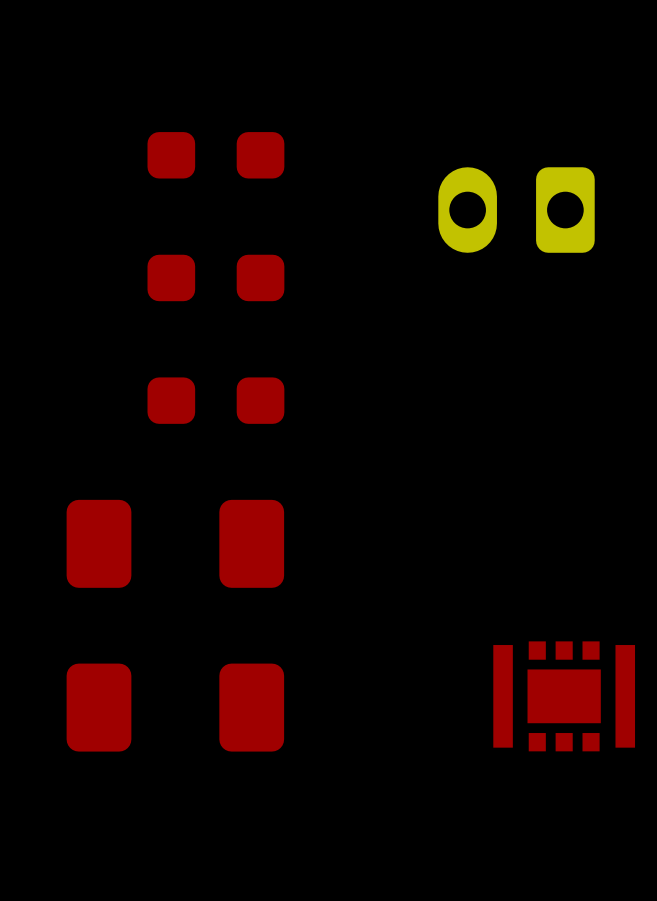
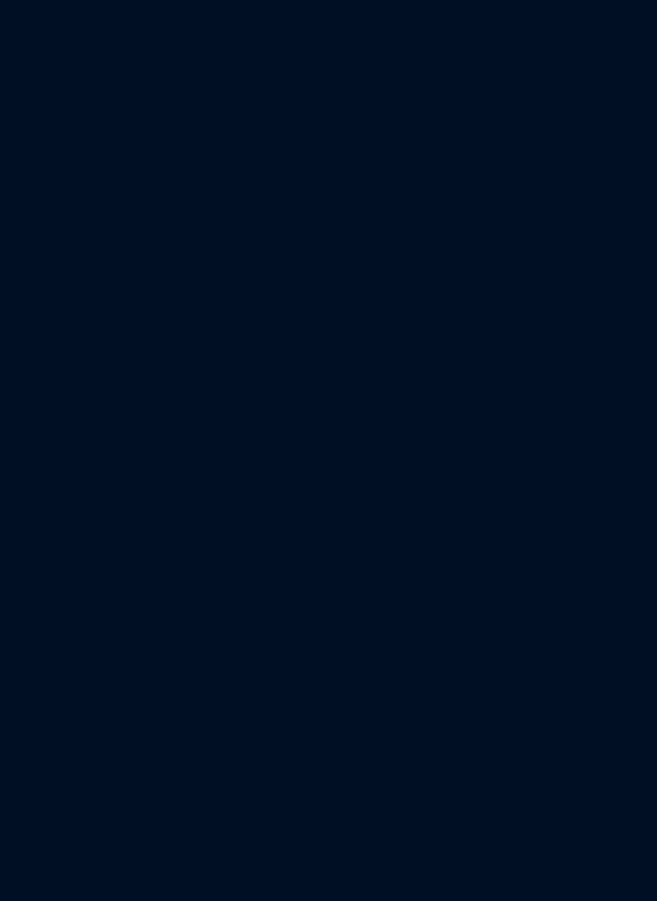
part: (215, 155) -> none
part: (516, 210) -> none
part: (215, 277) -> none
part: (215, 400) -> none
part: (175, 543) -> none
part: (564, 696) -> none
part: (175, 707) -> none

